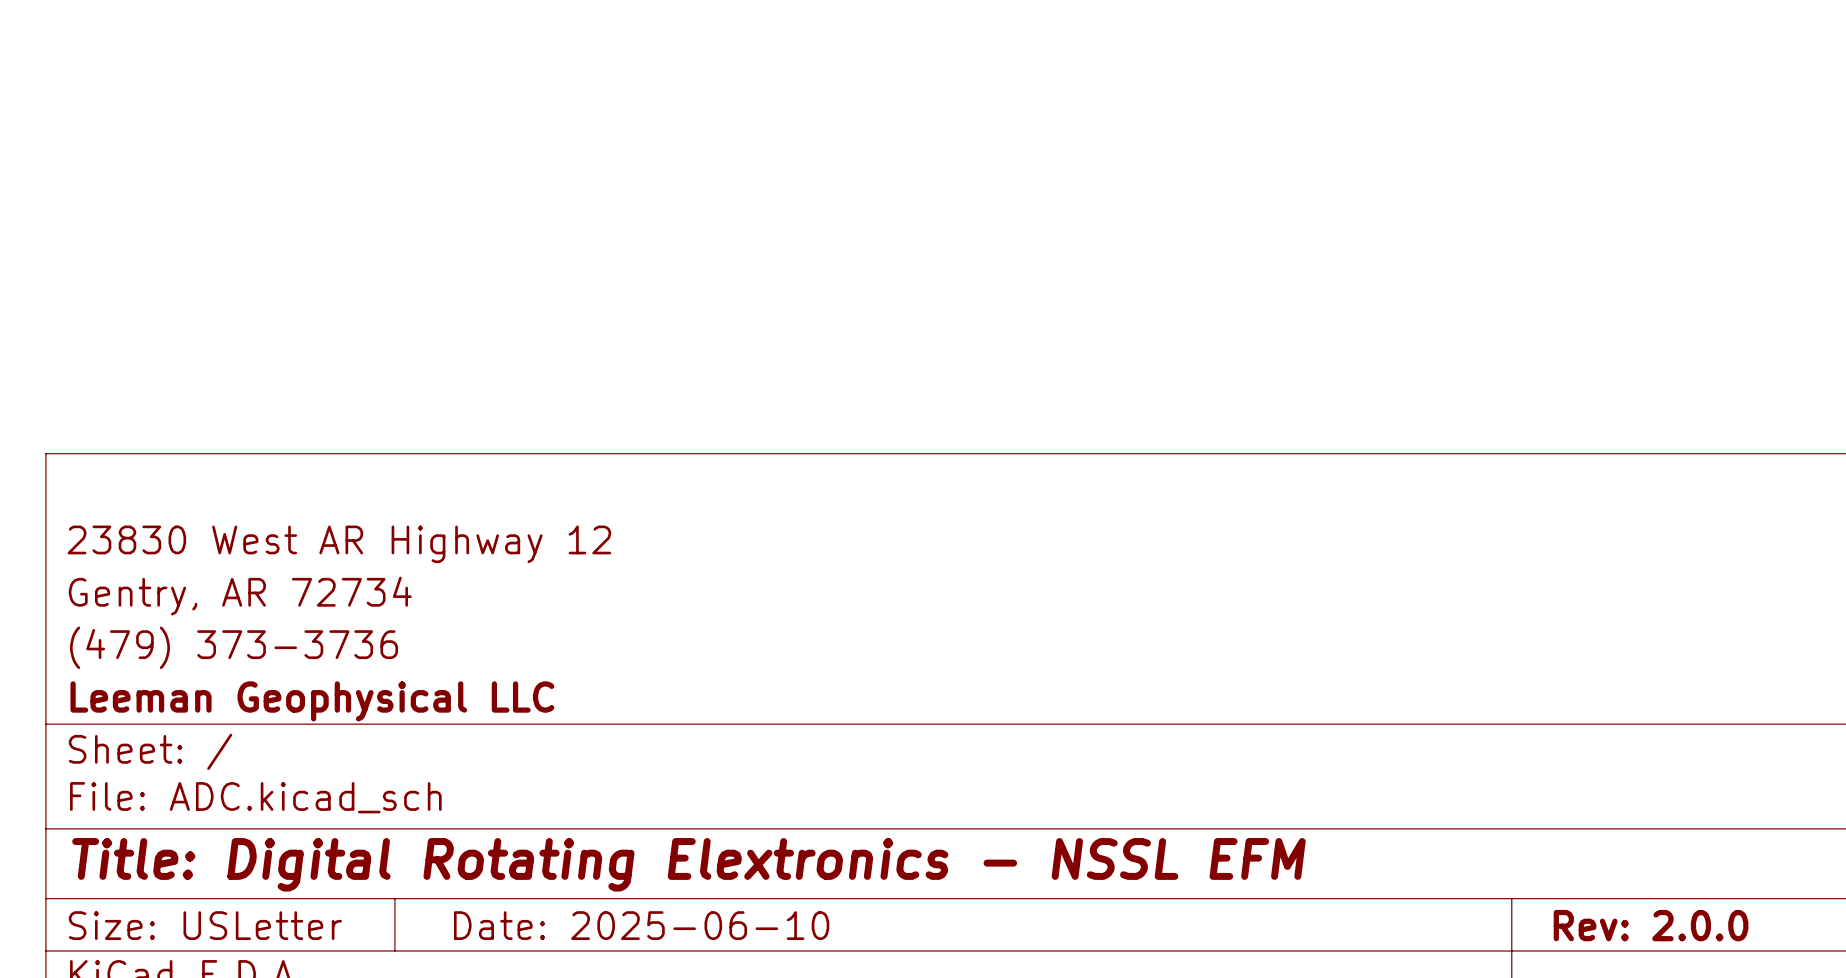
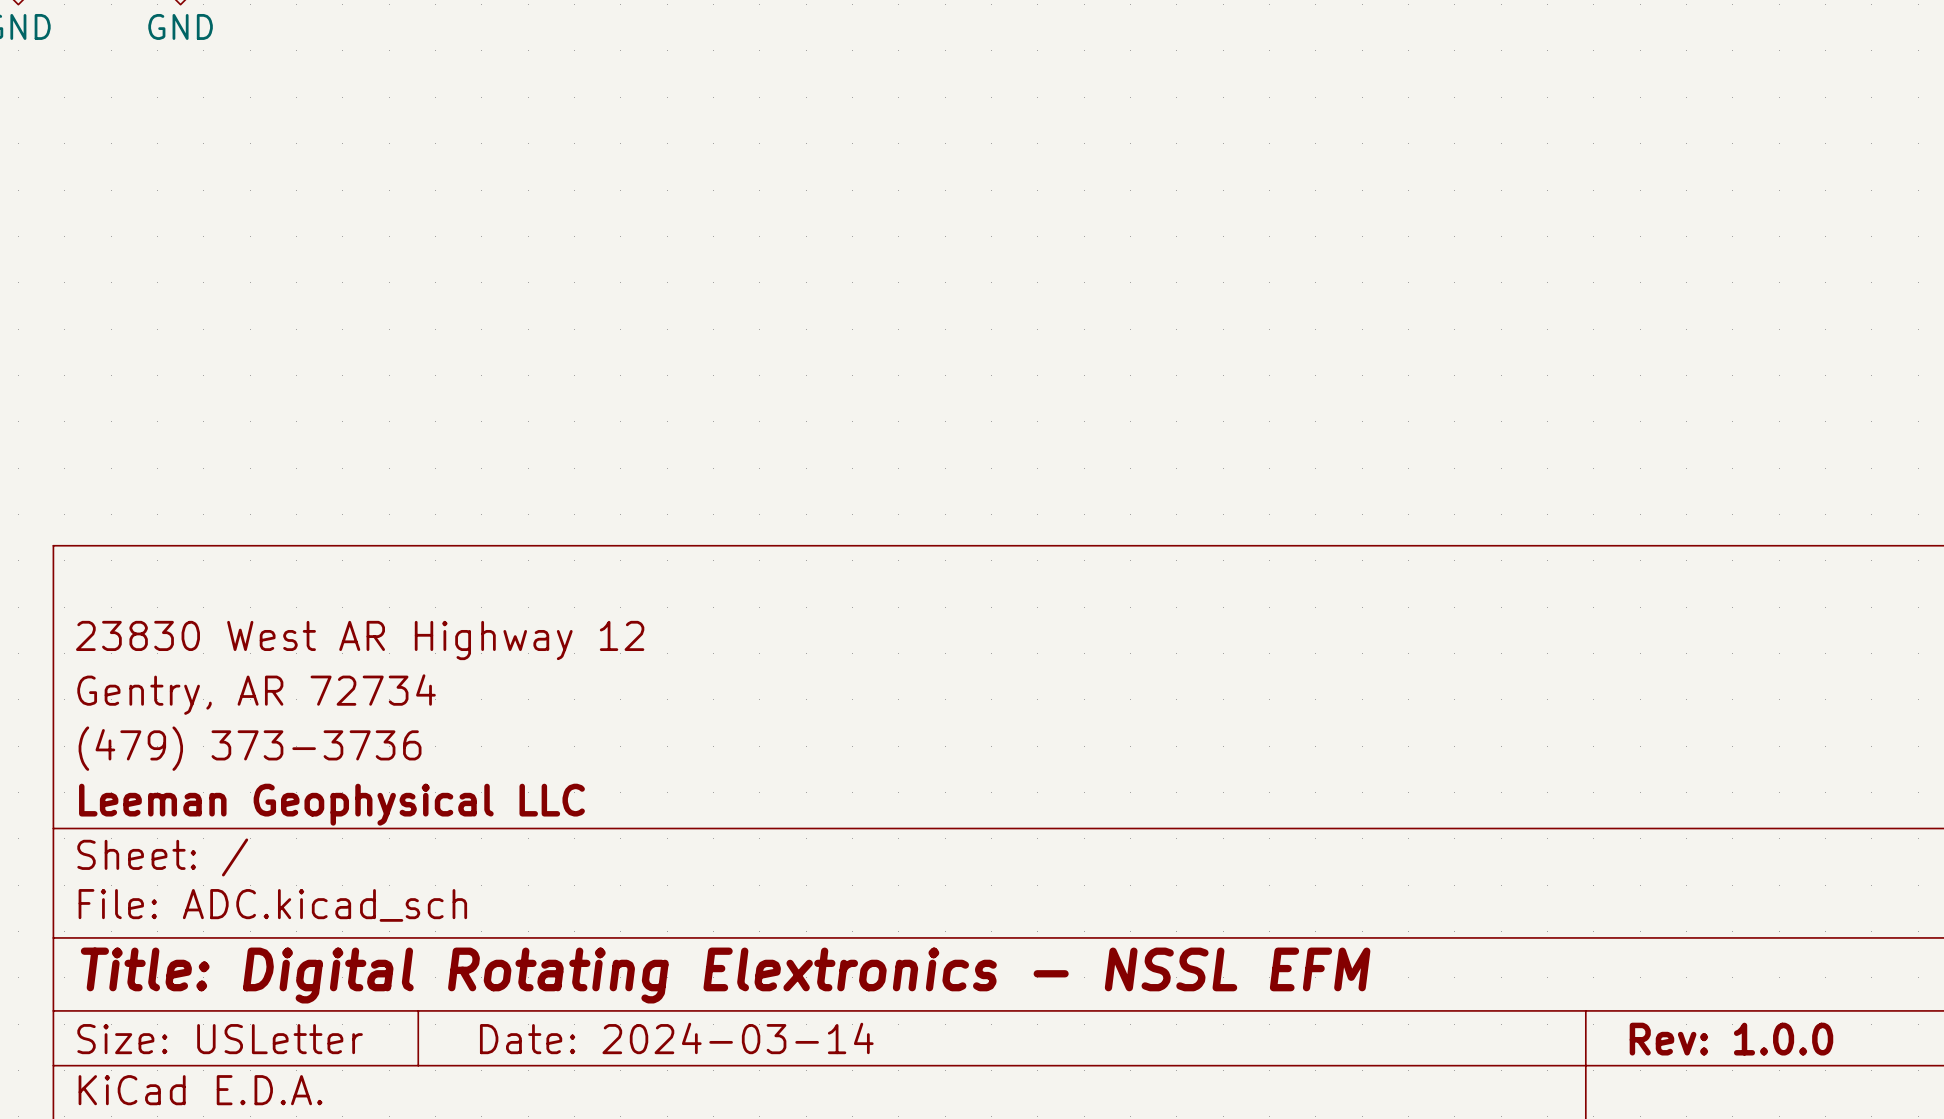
title block: Date: 2025-06-10 (641, 925) -> Date: 2024-03-14 (676, 1038)
title block: Rev: 2.0.0 (1651, 925) -> Rev: 1.0.0 (1731, 1039)

